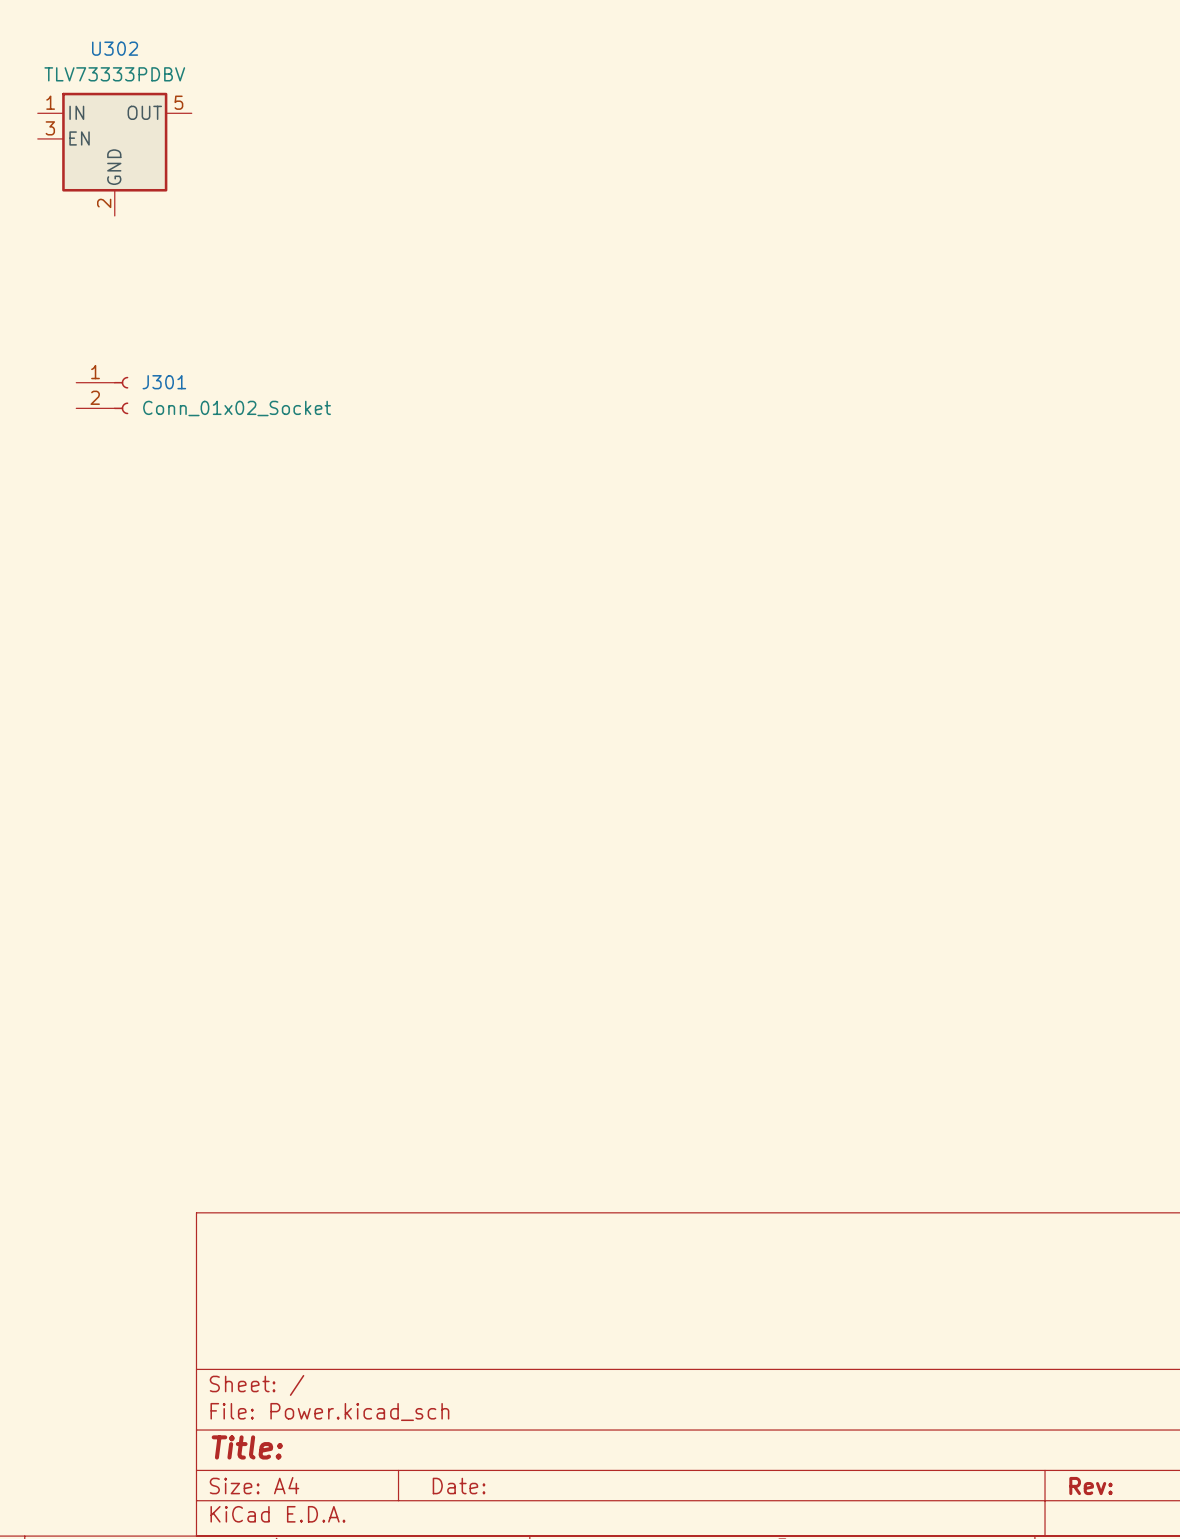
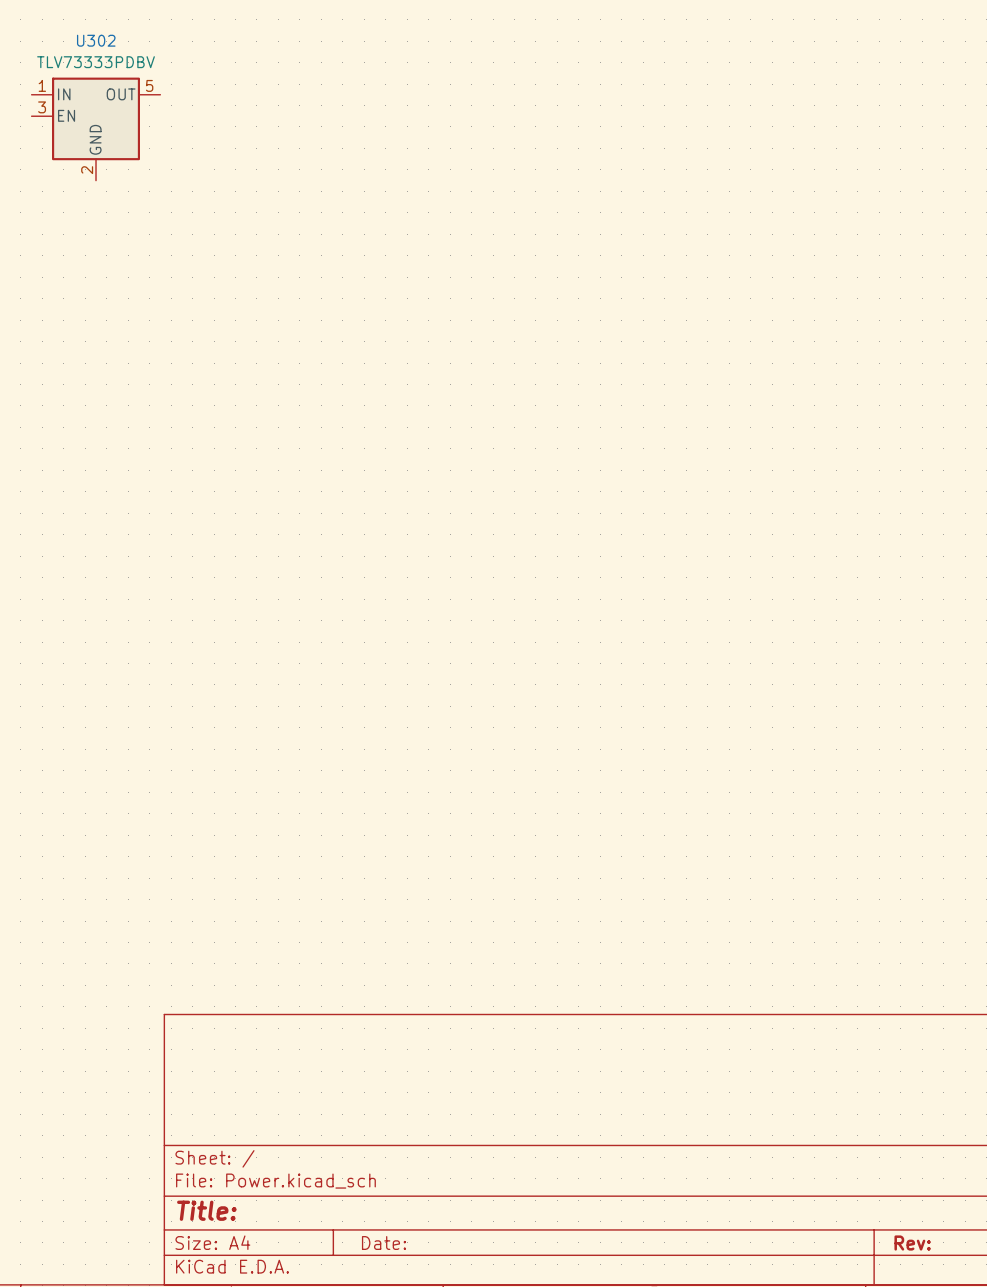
J301: Conn_01x02_Socket (102, 395) -> none

